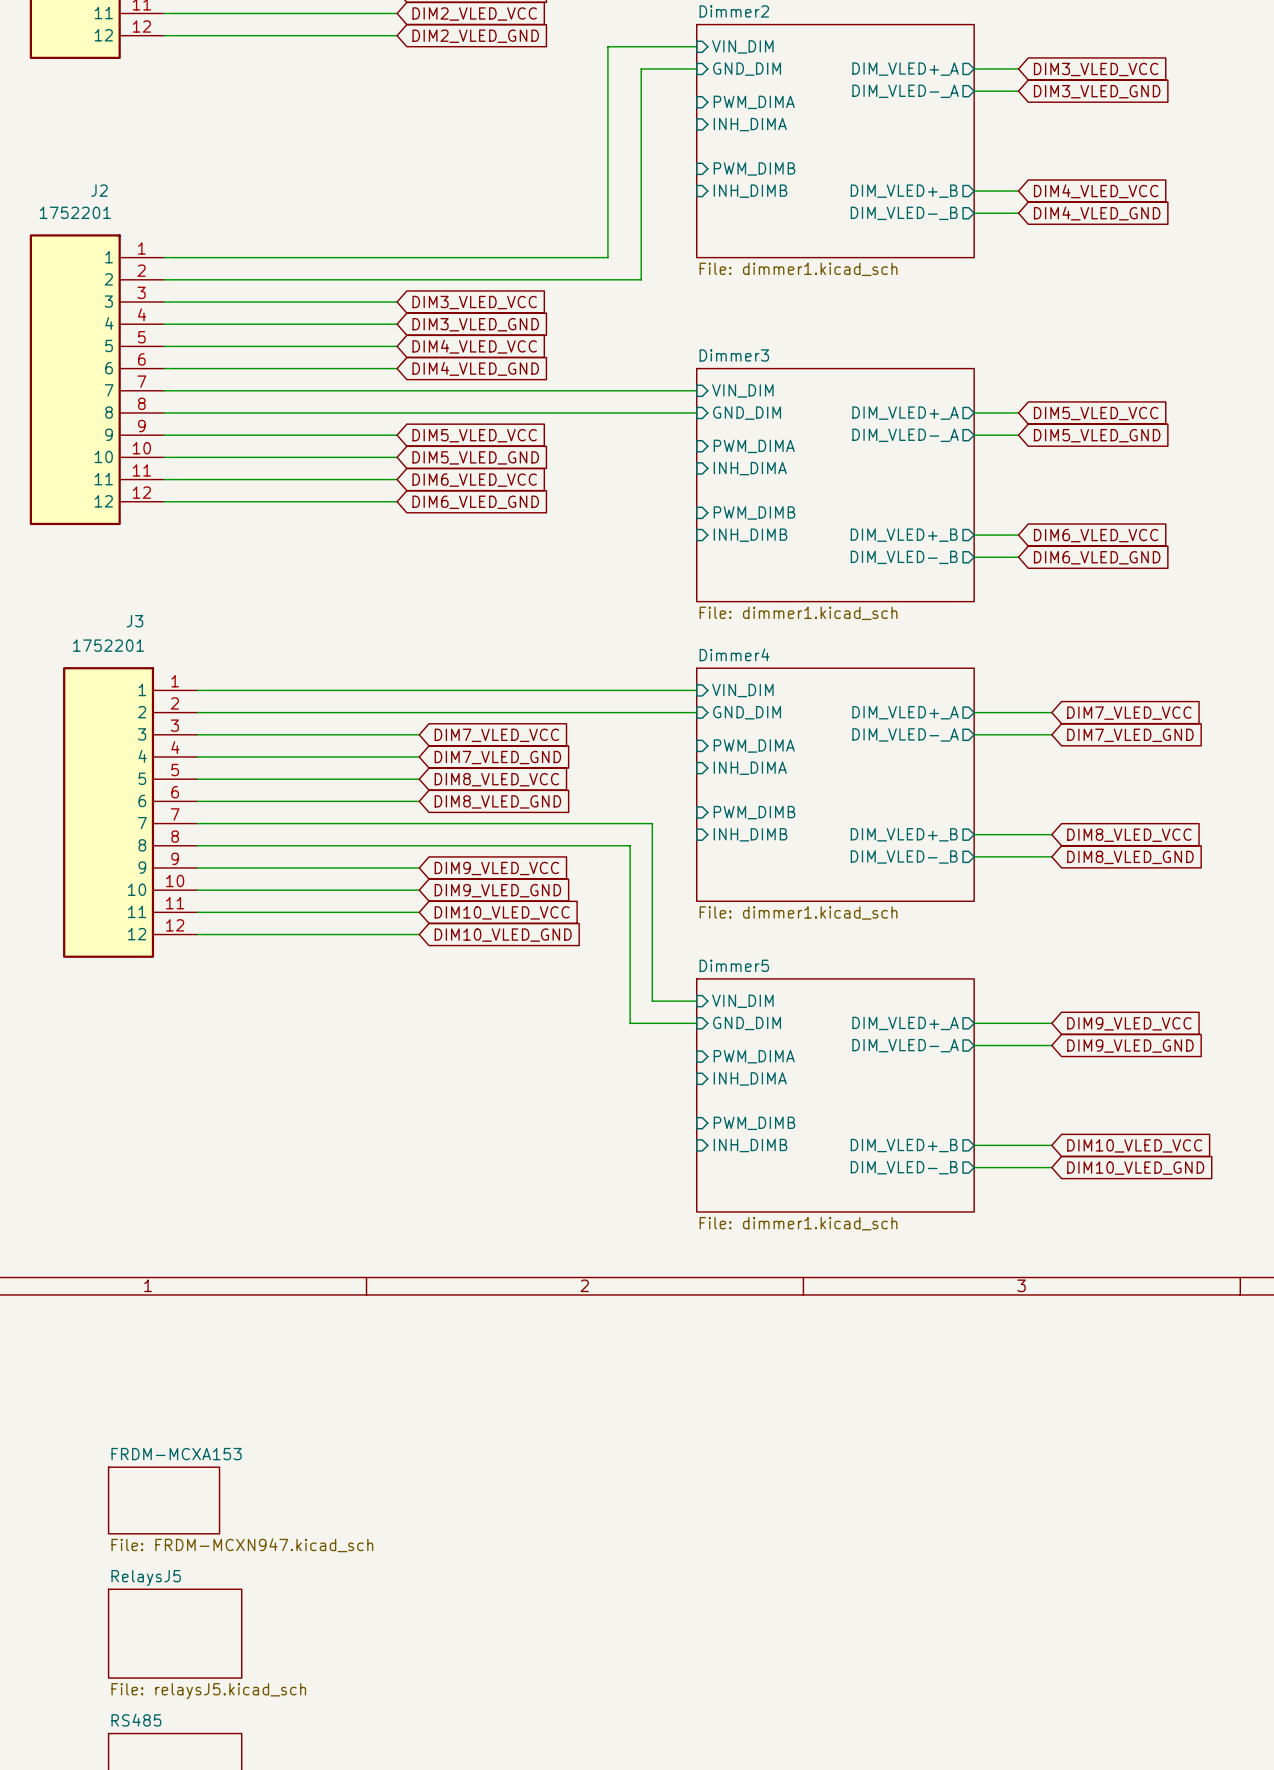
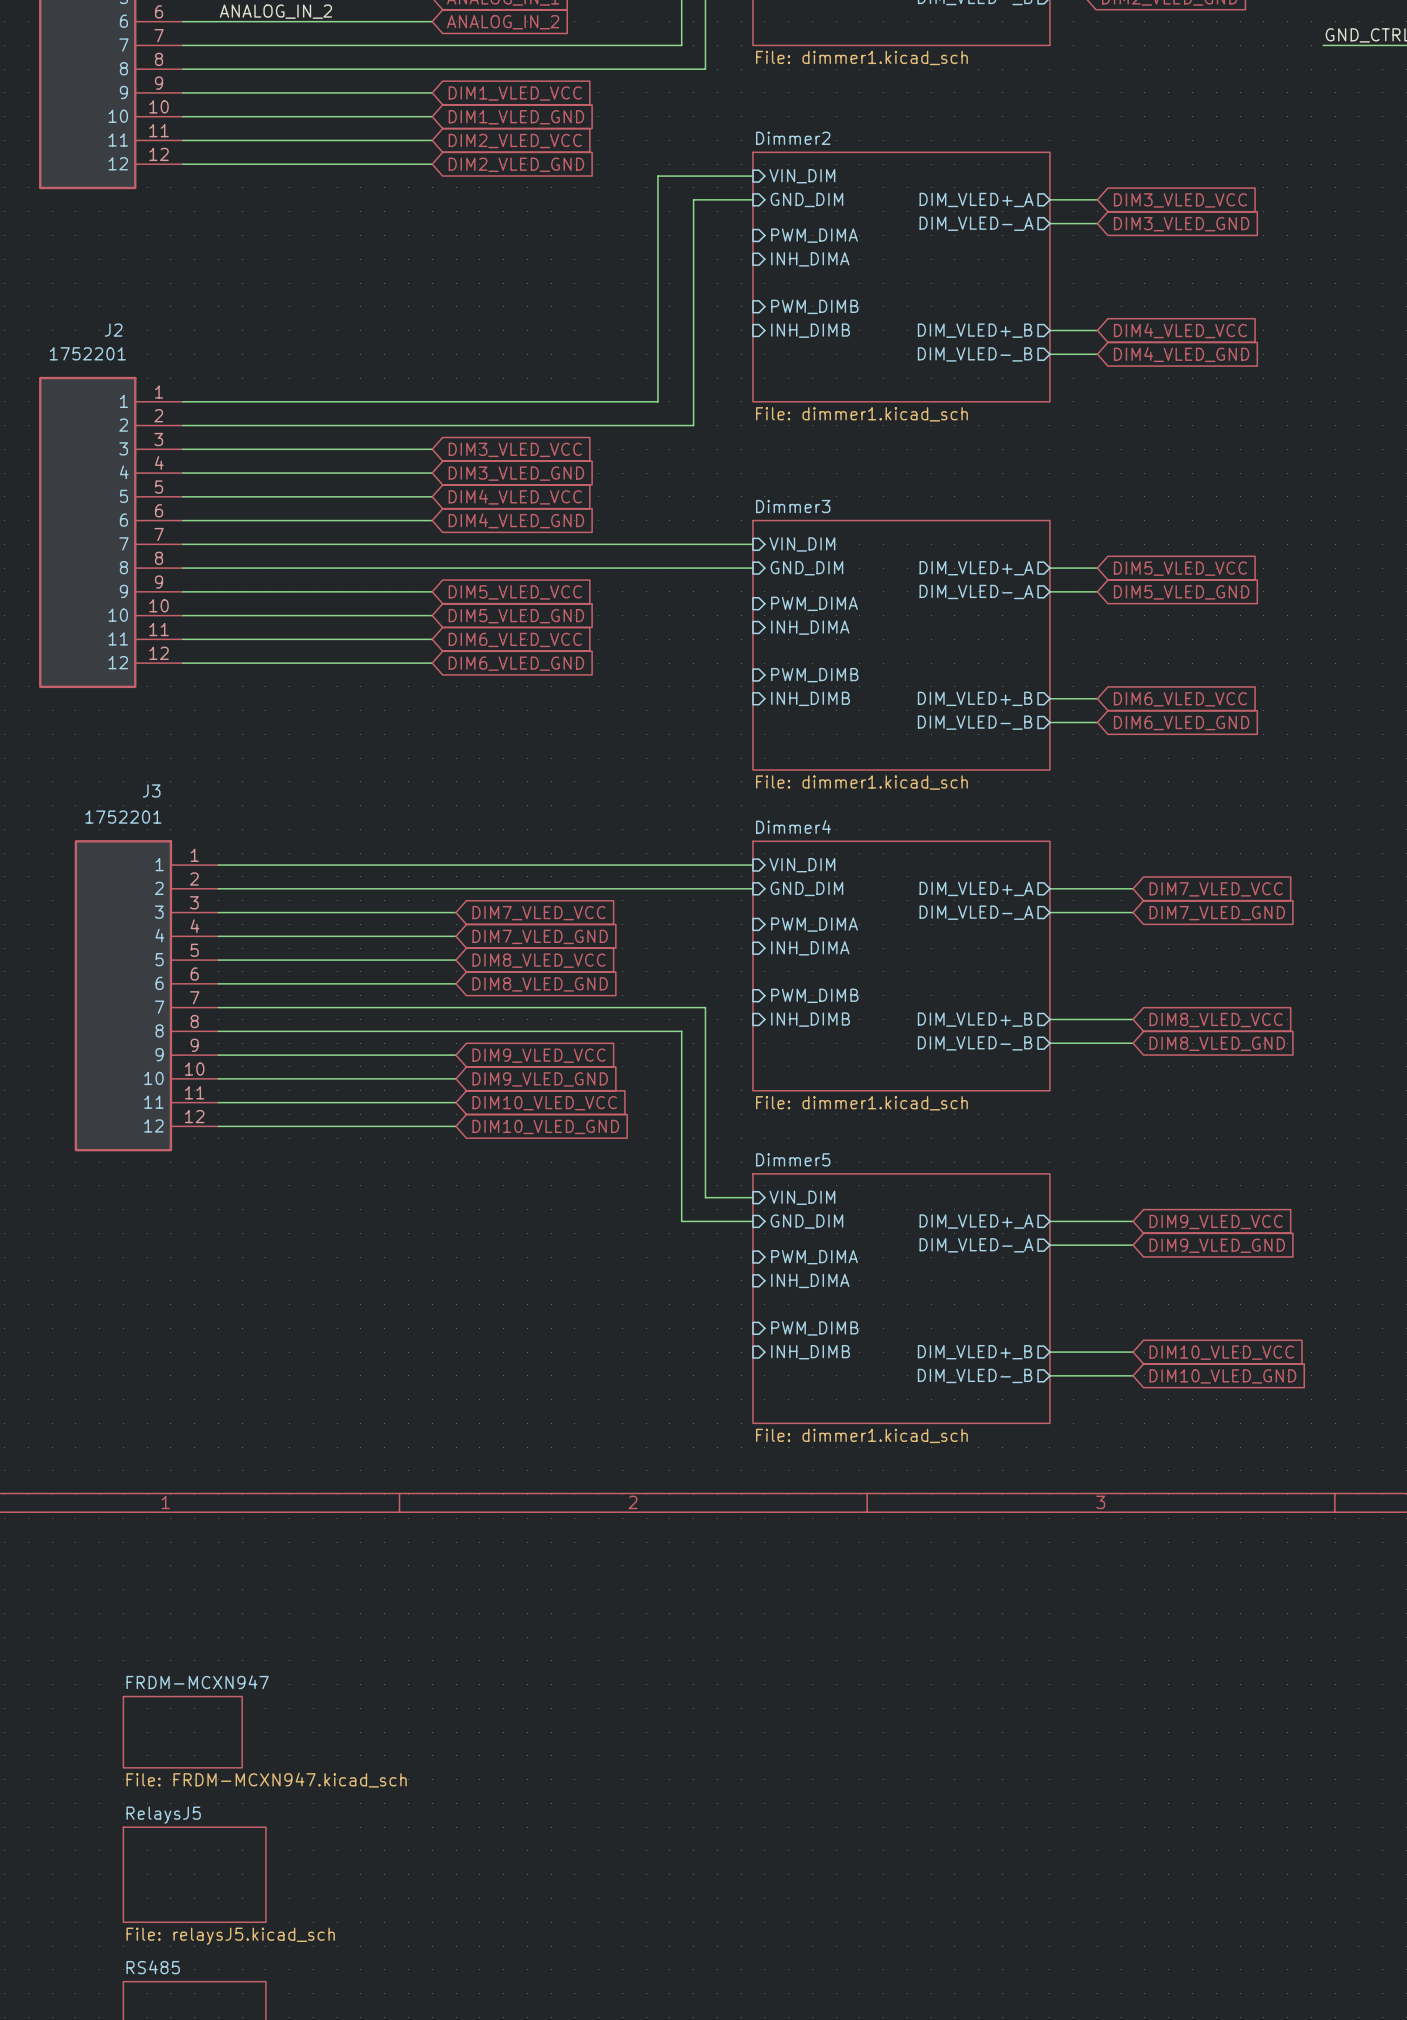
sheet FRDM-MCXA153 name: FRDM-MCXA153 (176, 1454) -> FRDM-MCXN947 (197, 1682)

